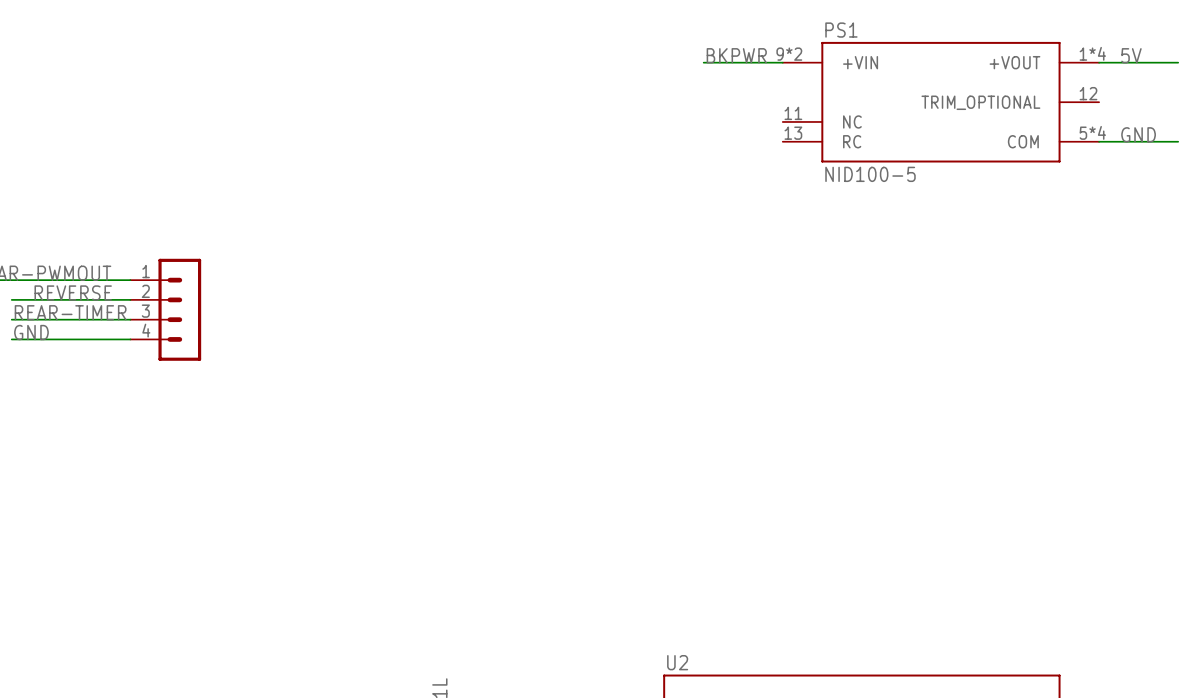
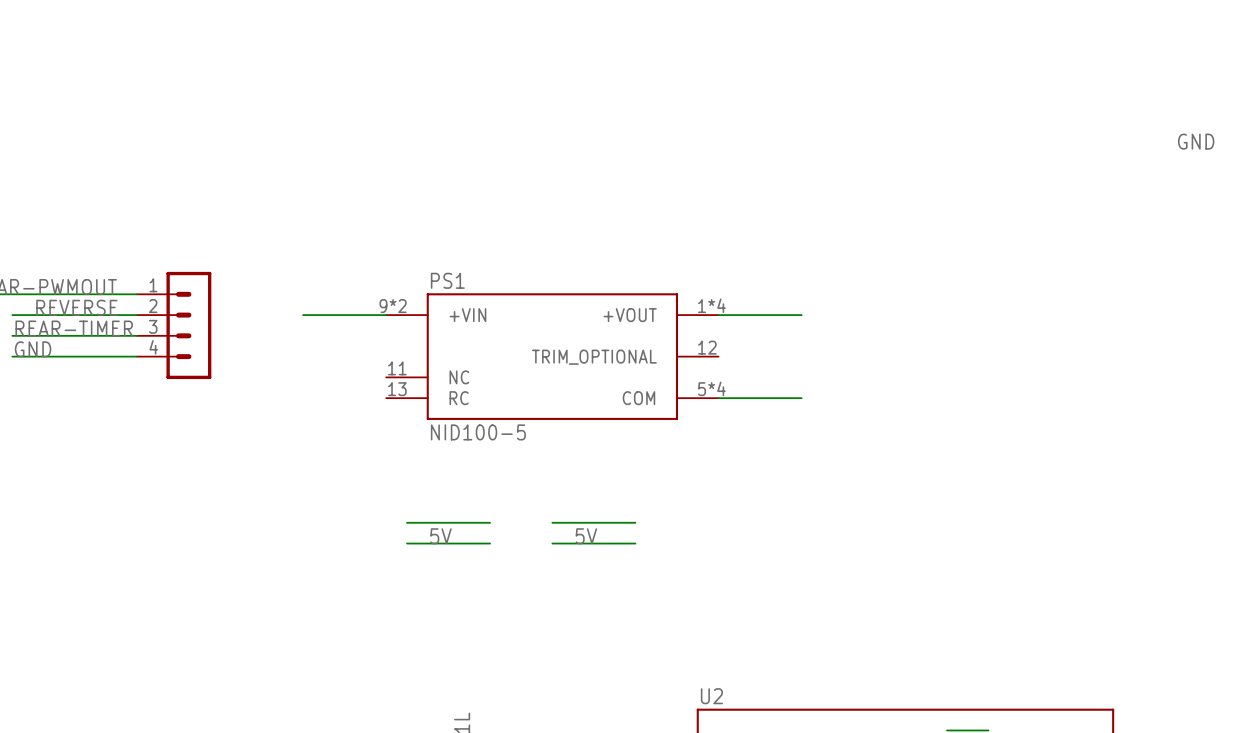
label: BKPWR (736, 55) -> none
label: 5V (1131, 55) -> none
wire: (703, 62) (782, 62) -> none
wire: (1099, 62) (1178, 62) -> none
PS1 position: (940, 102) -> (552, 356)
wire: (1099, 141) (1178, 141) -> none
wire: none -> (303, 315) (386, 315)
wire: none -> (718, 315) (801, 315)
wire: none -> (718, 398) (801, 398)
wire: none -> (406, 522) (490, 522)
wire: none -> (552, 522) (635, 522)
label: none -> 5V (440, 536)
label: none -> 5V (586, 536)
wire: none -> (406, 543) (490, 543)
wire: none -> (552, 543) (635, 543)
wire: none -> (946, 730) (988, 730)

